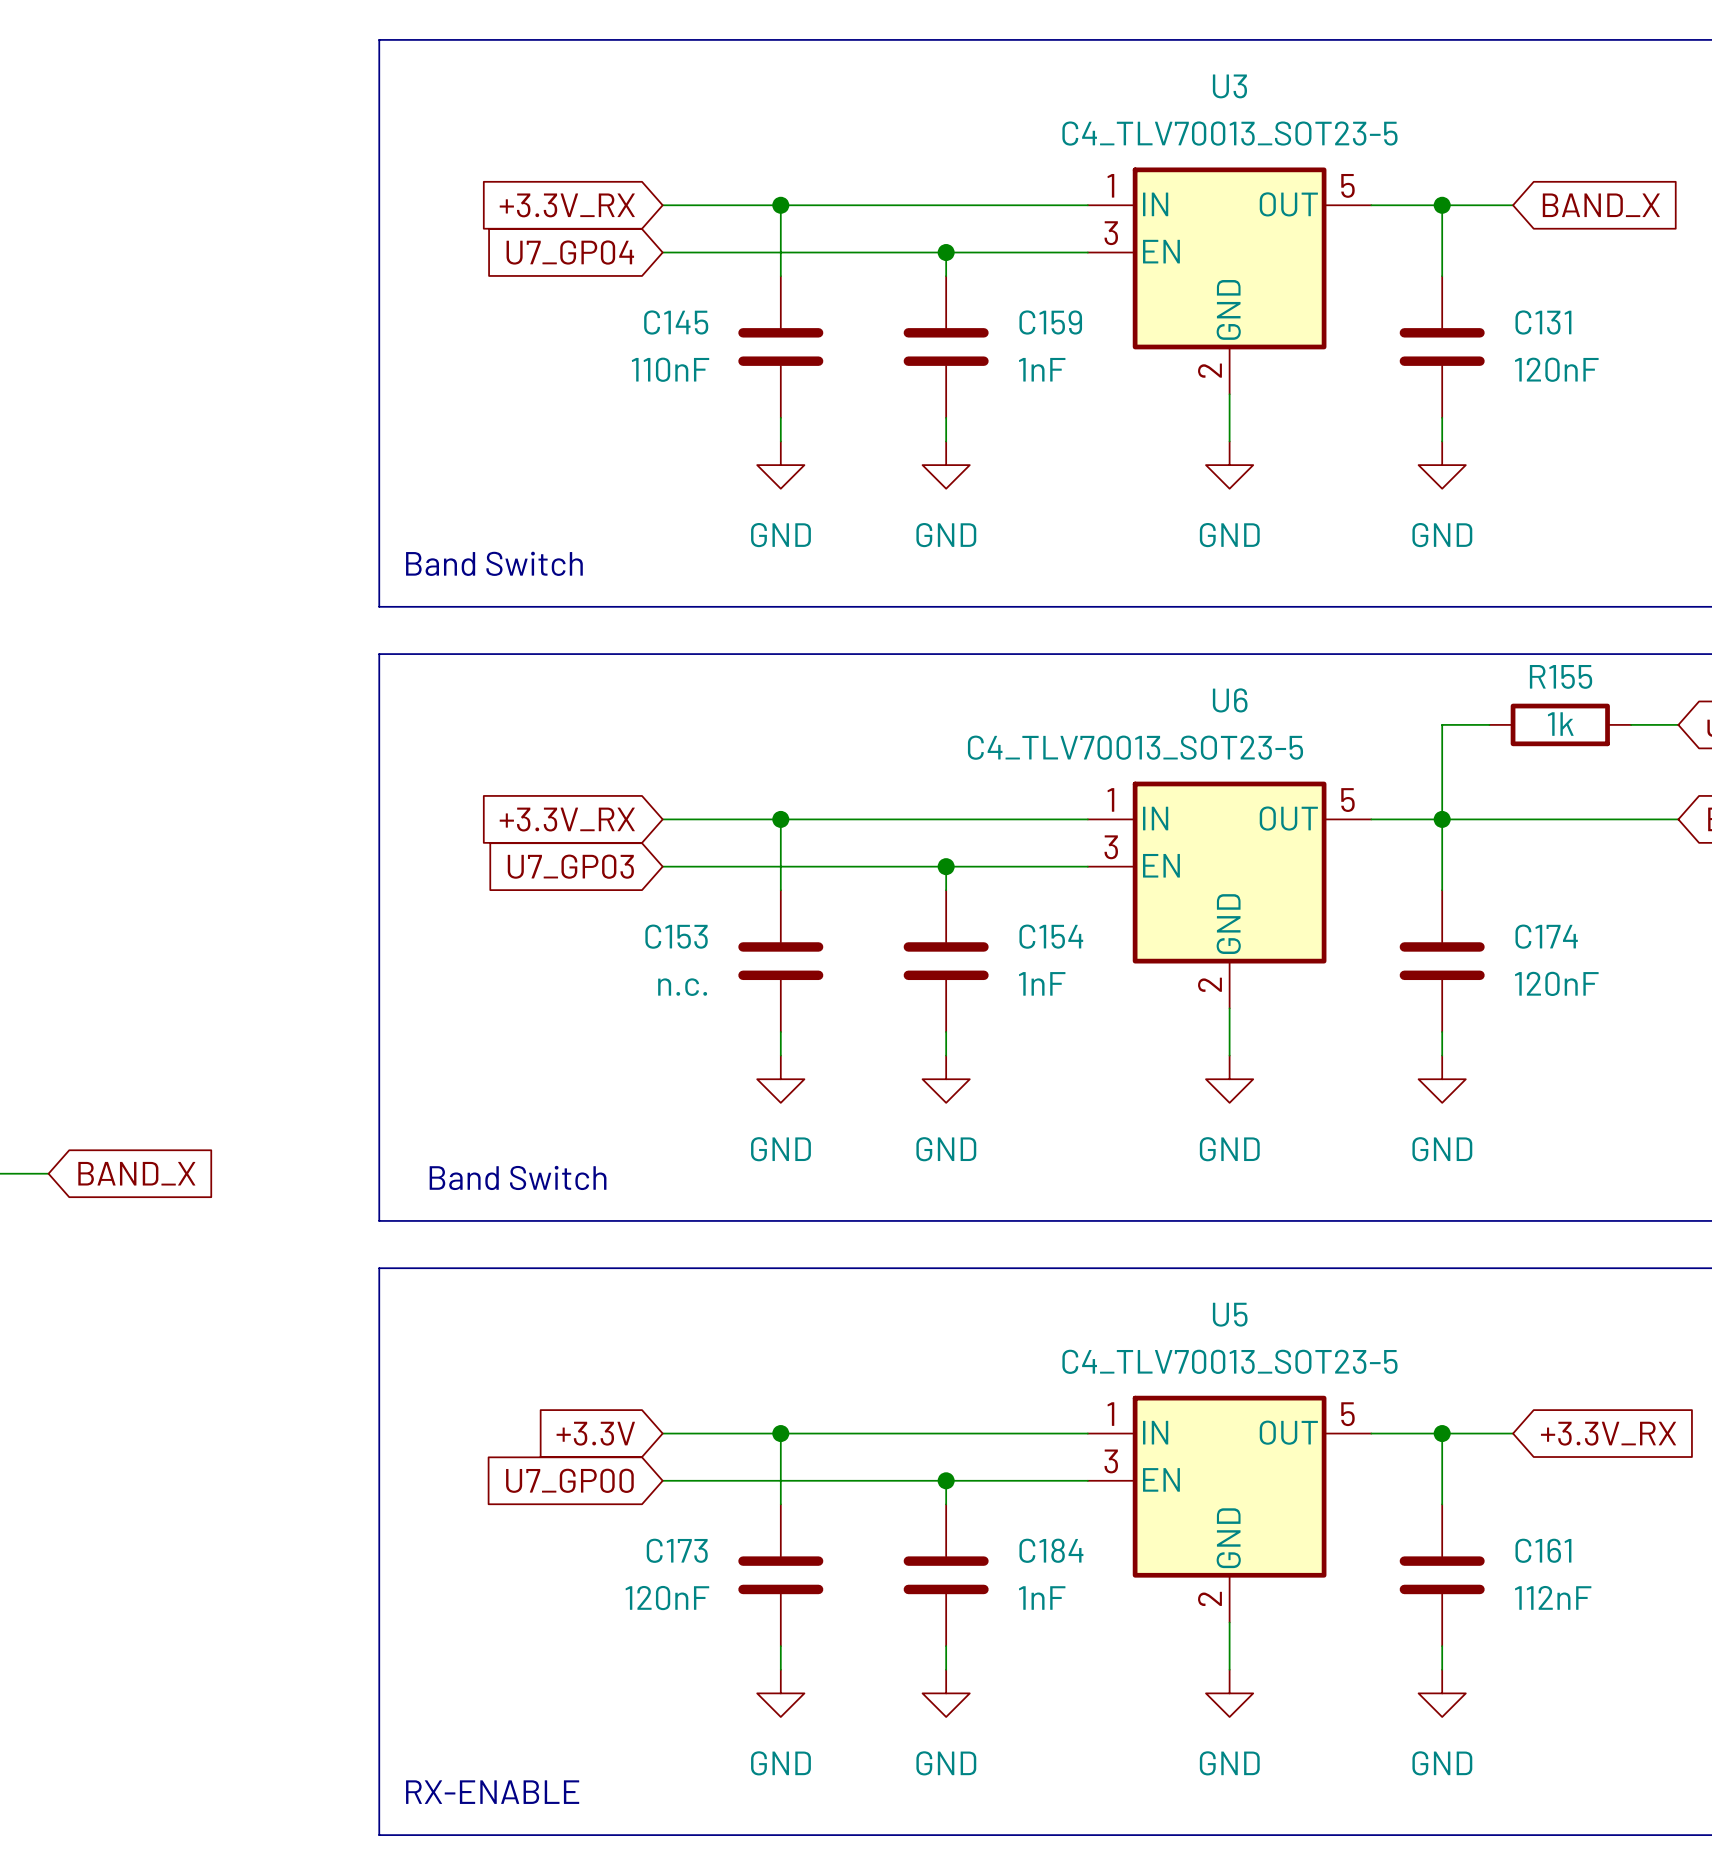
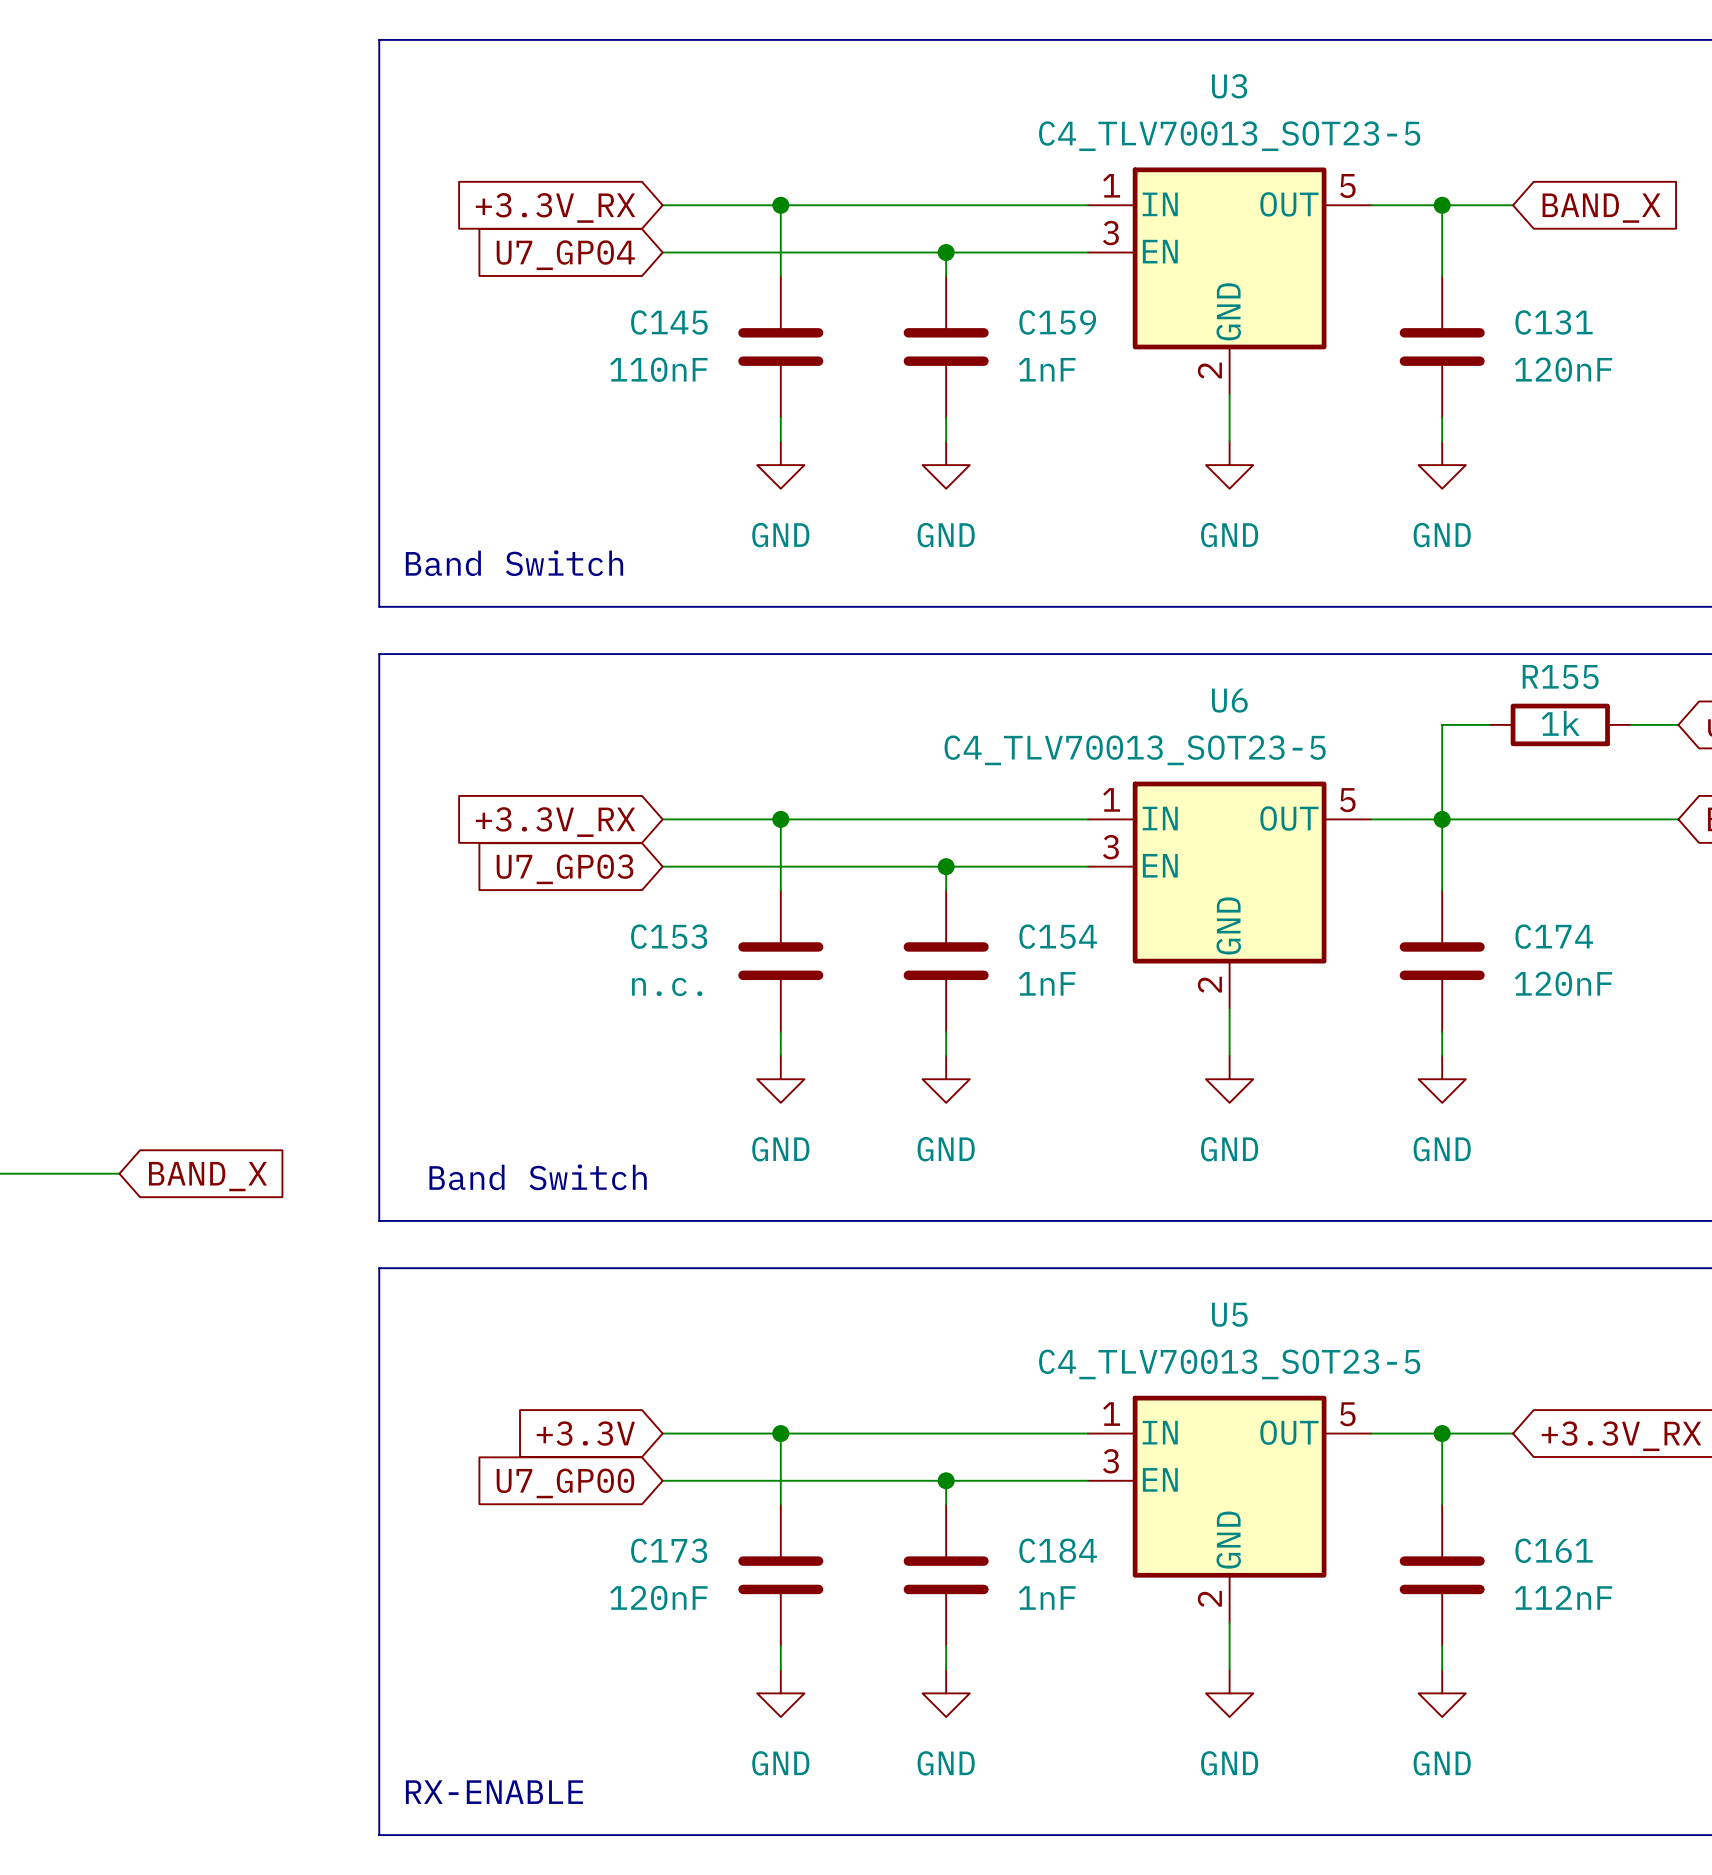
wire: none -> (48, 1173) (119, 1173)
global label position: BAND_X (136, 1173) -> BAND_X (207, 1176)

